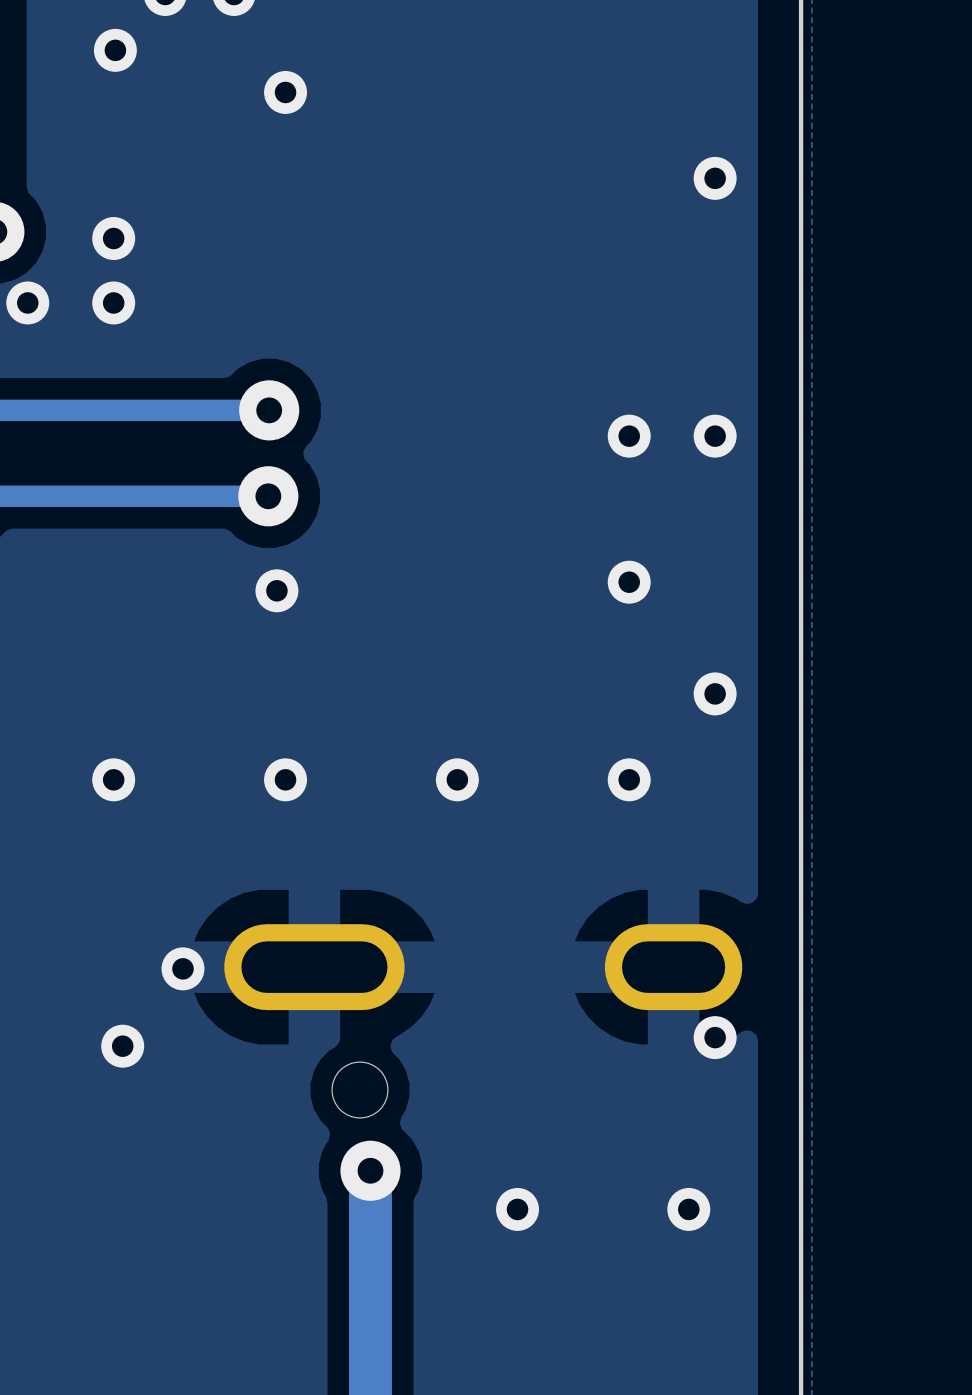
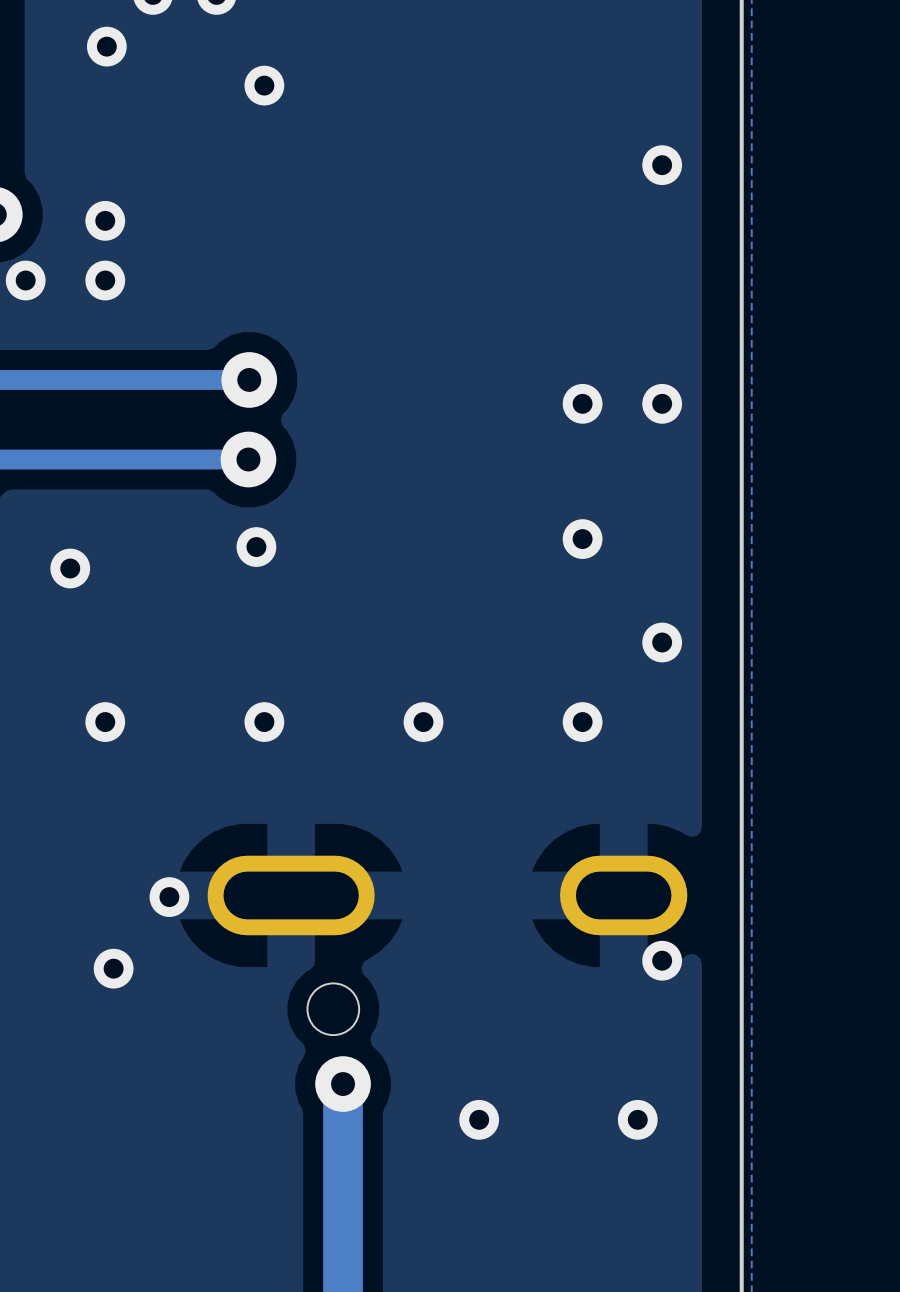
via: none -> (70, 568)

